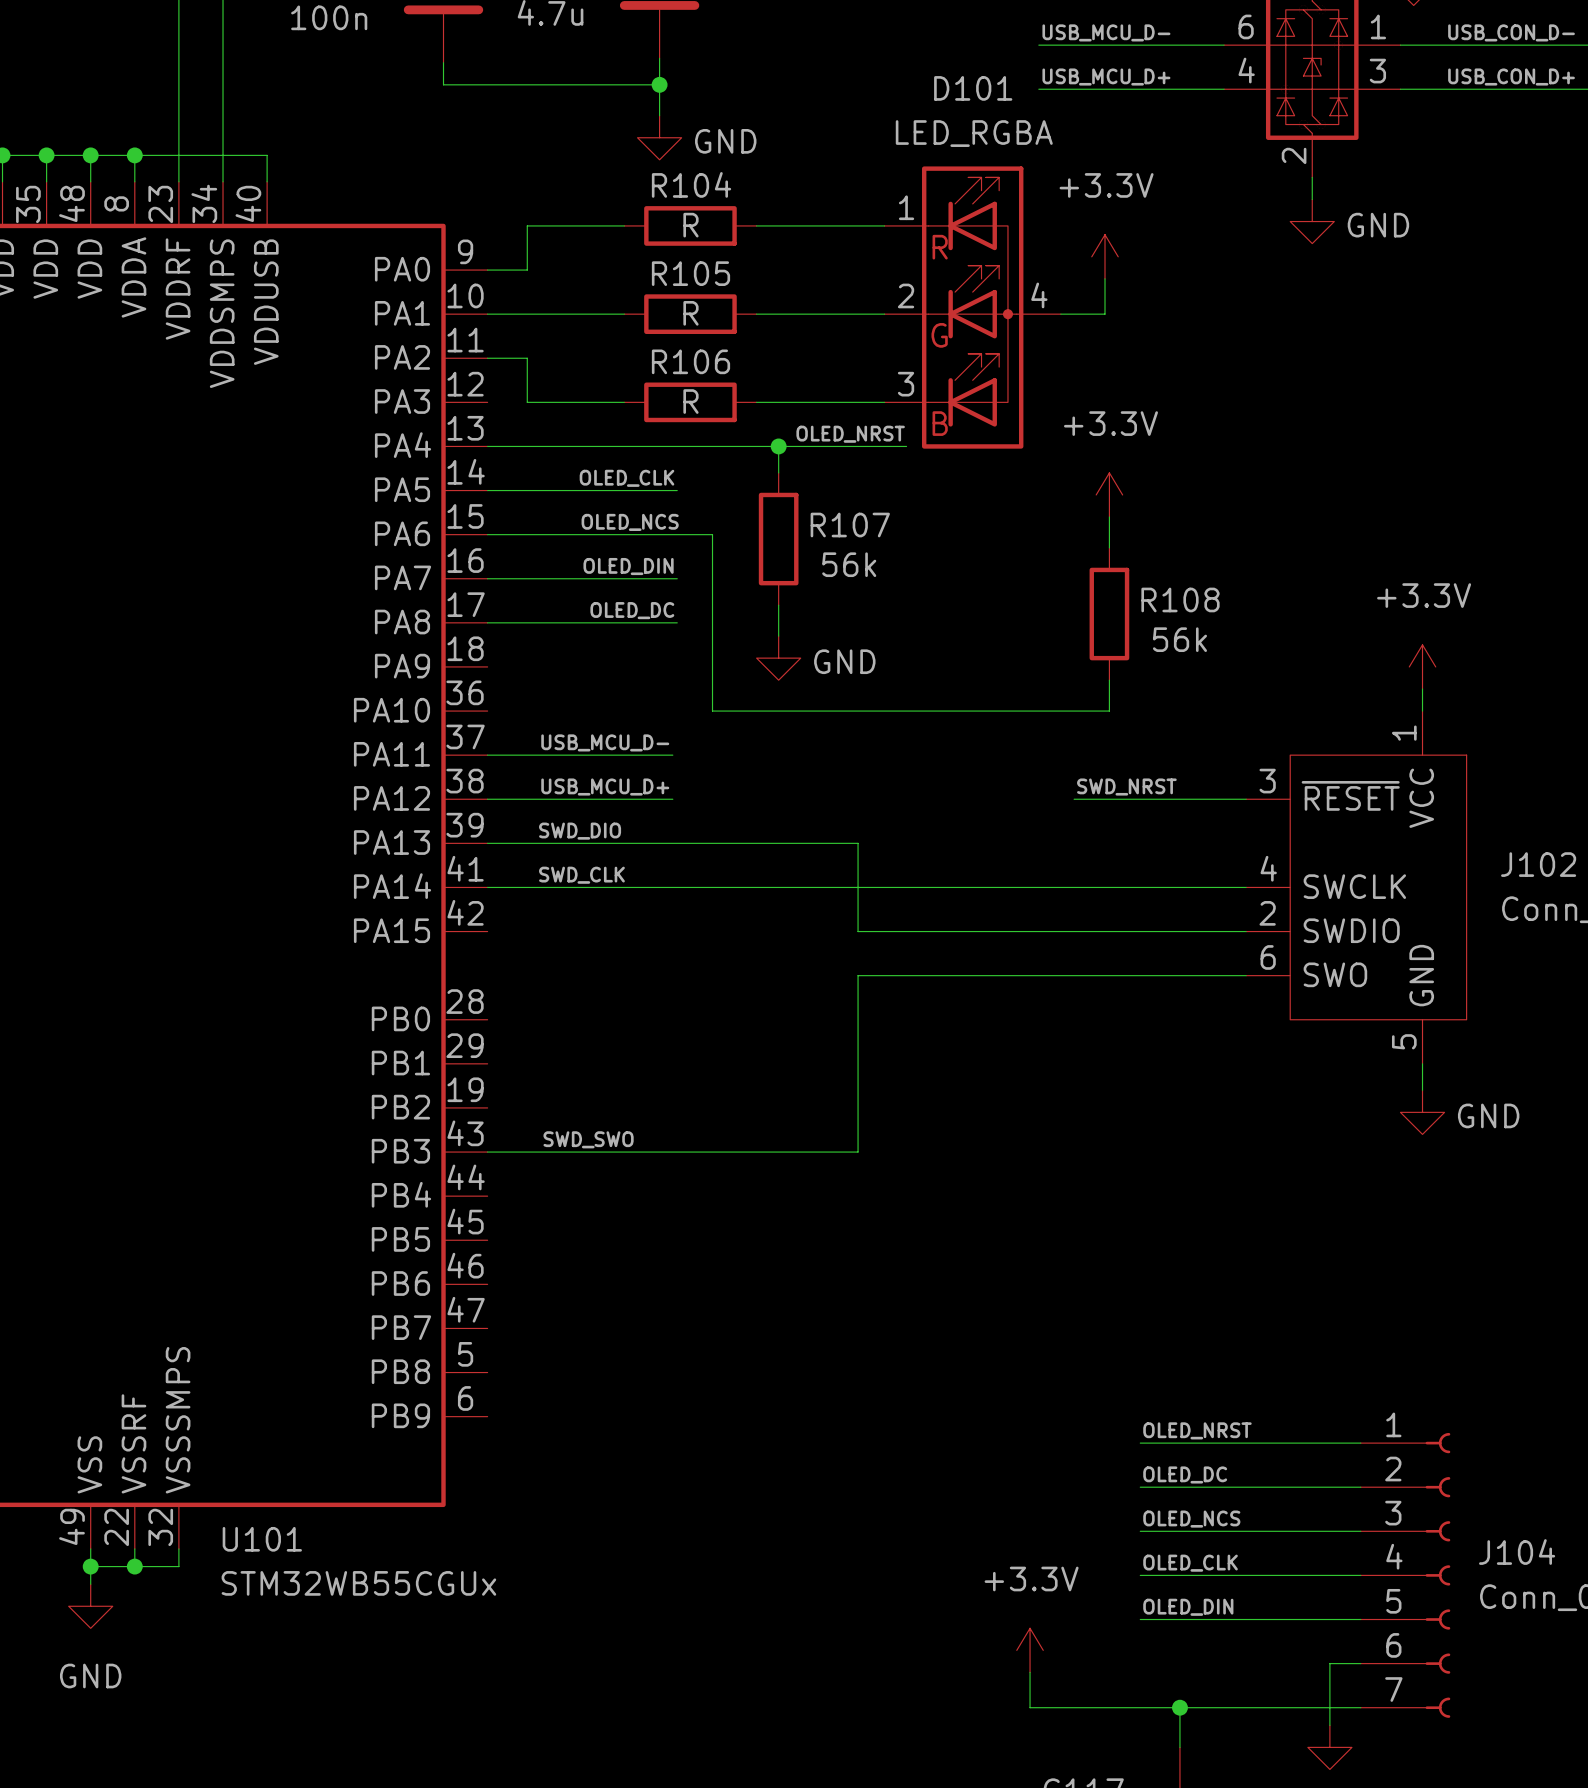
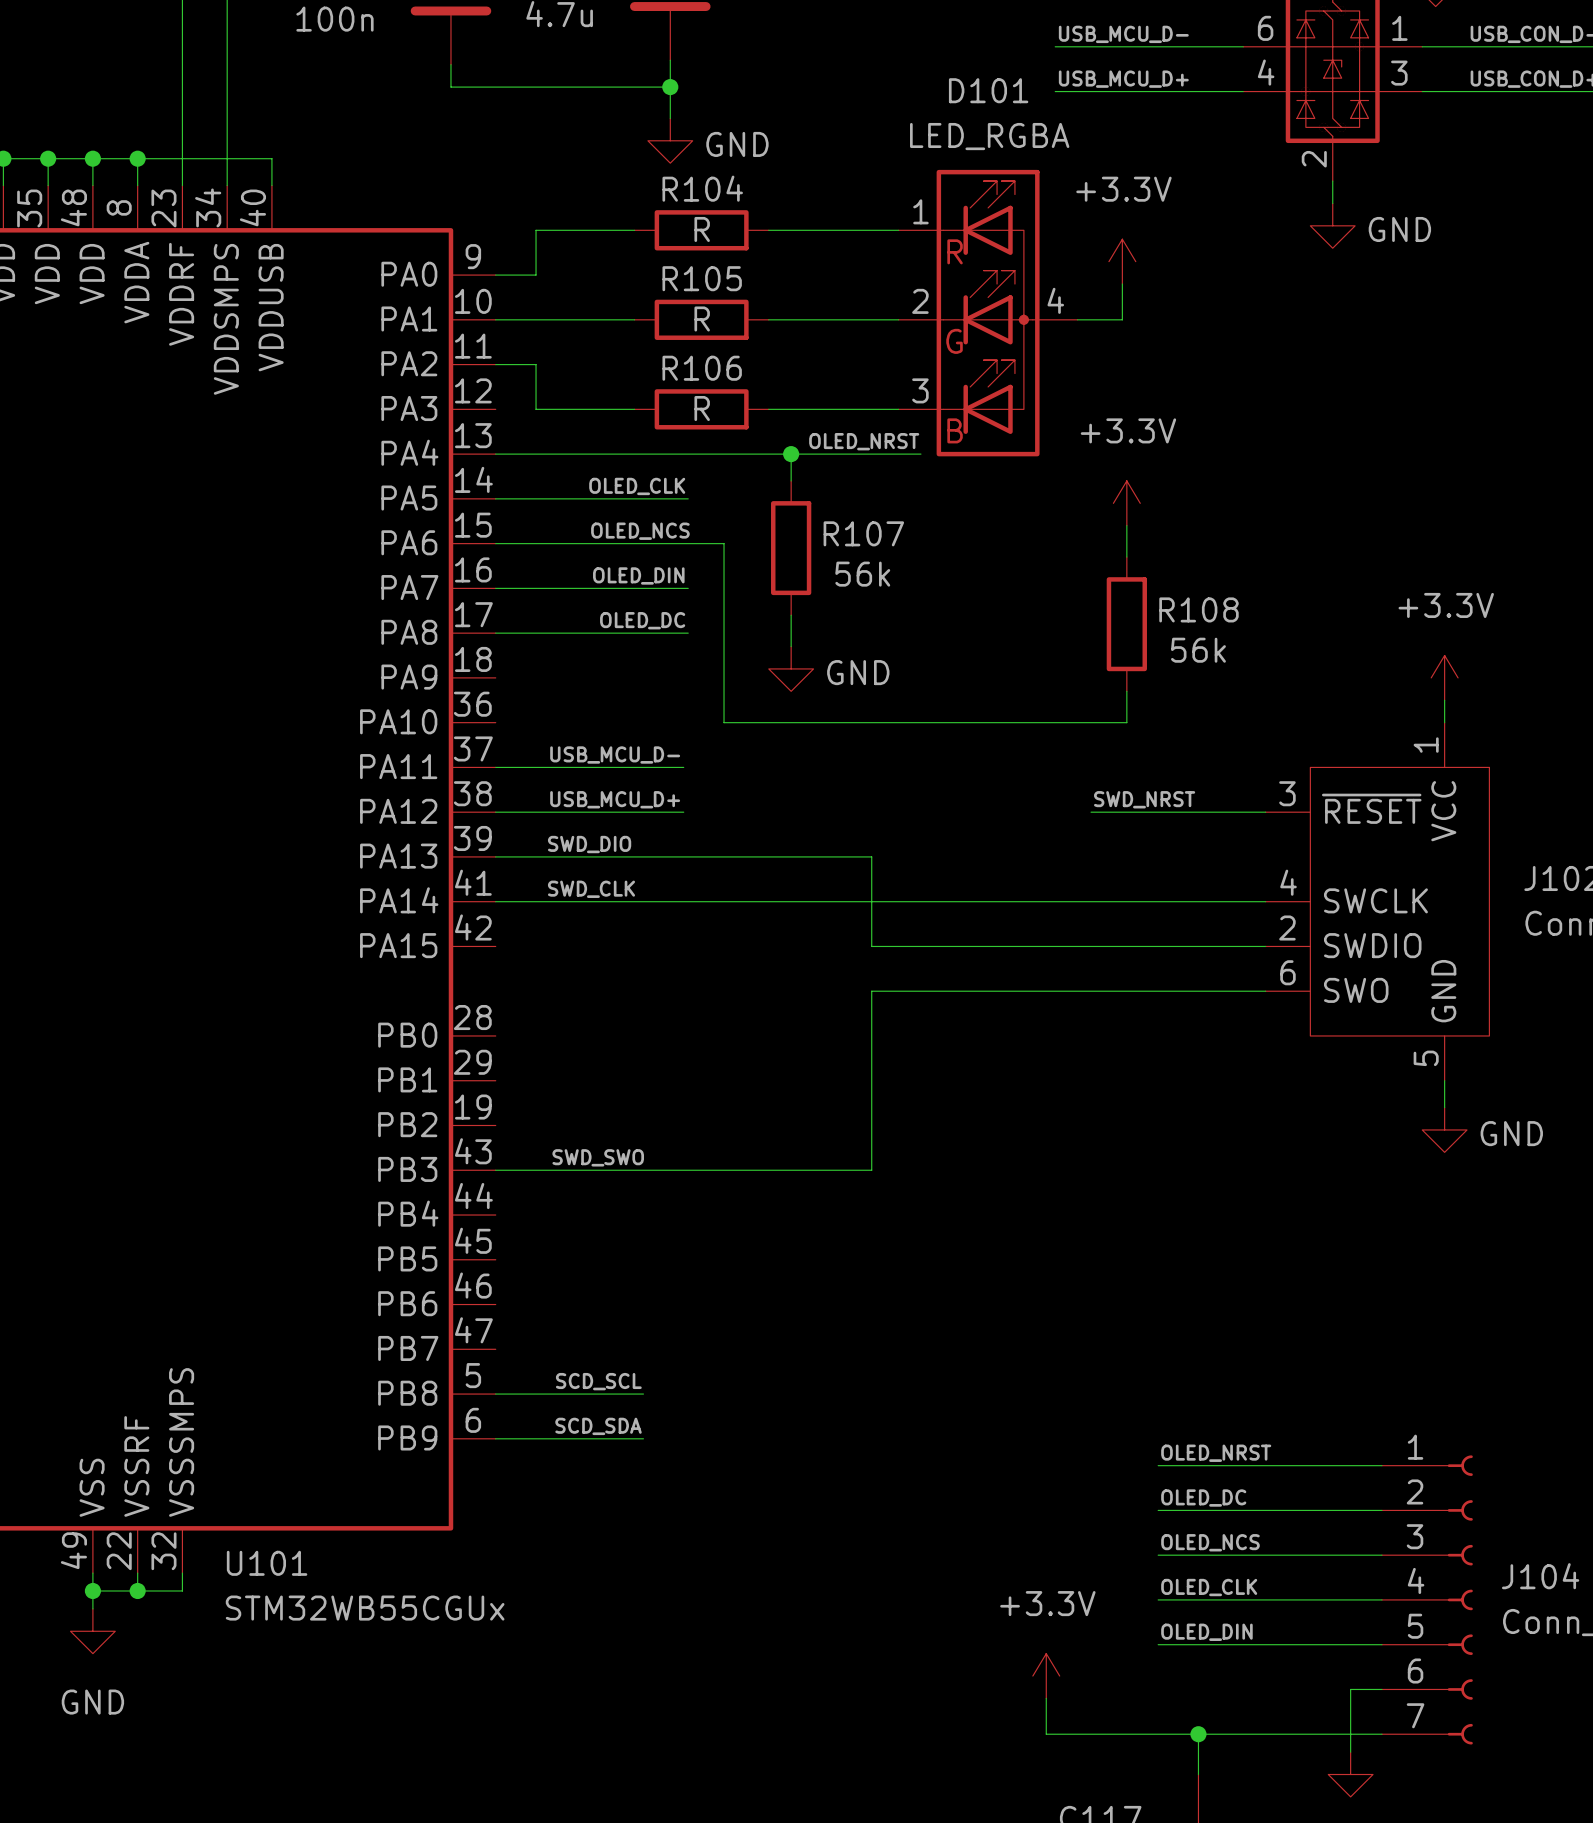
label: none -> SCD_SCL (598, 1381)
wire: none -> (495, 1394) (643, 1394)
label: none -> SCD_SDA (598, 1426)
wire: none -> (495, 1438) (643, 1438)

